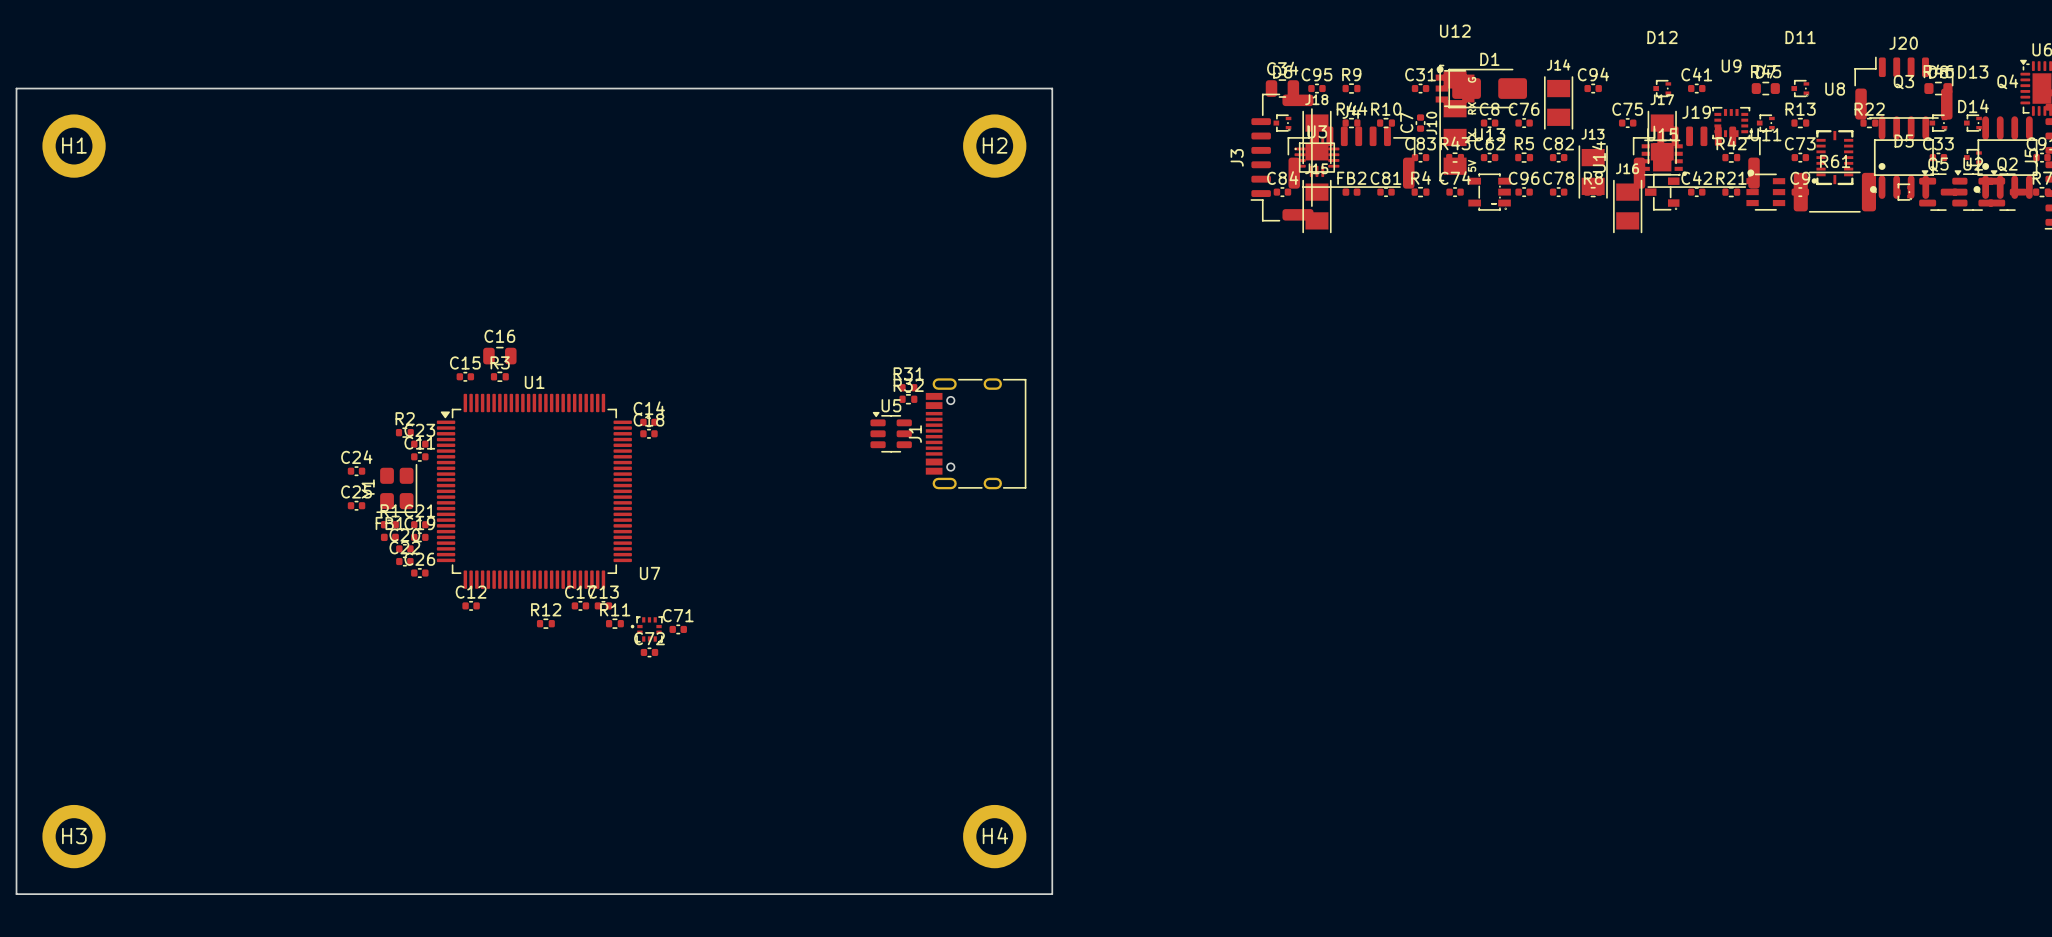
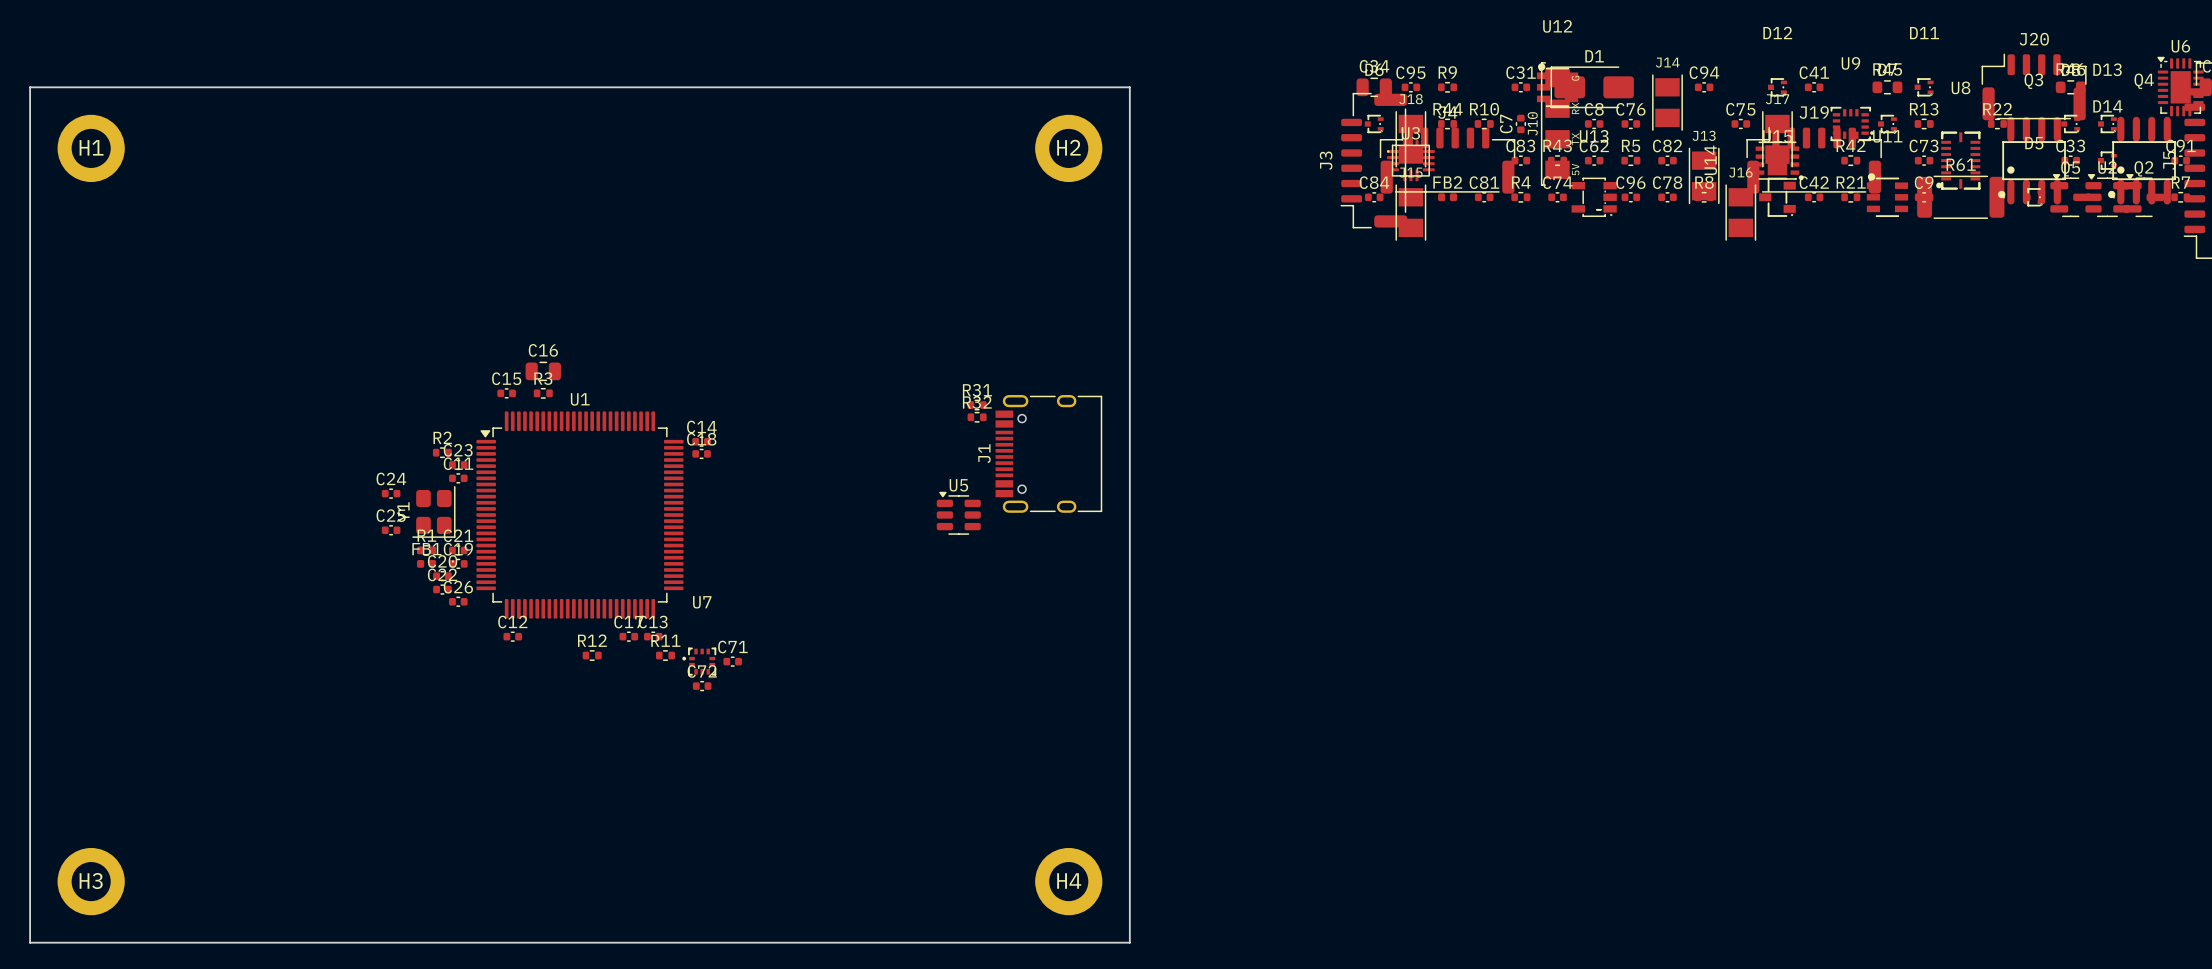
U5 position: (891, 432) -> (958, 513)

